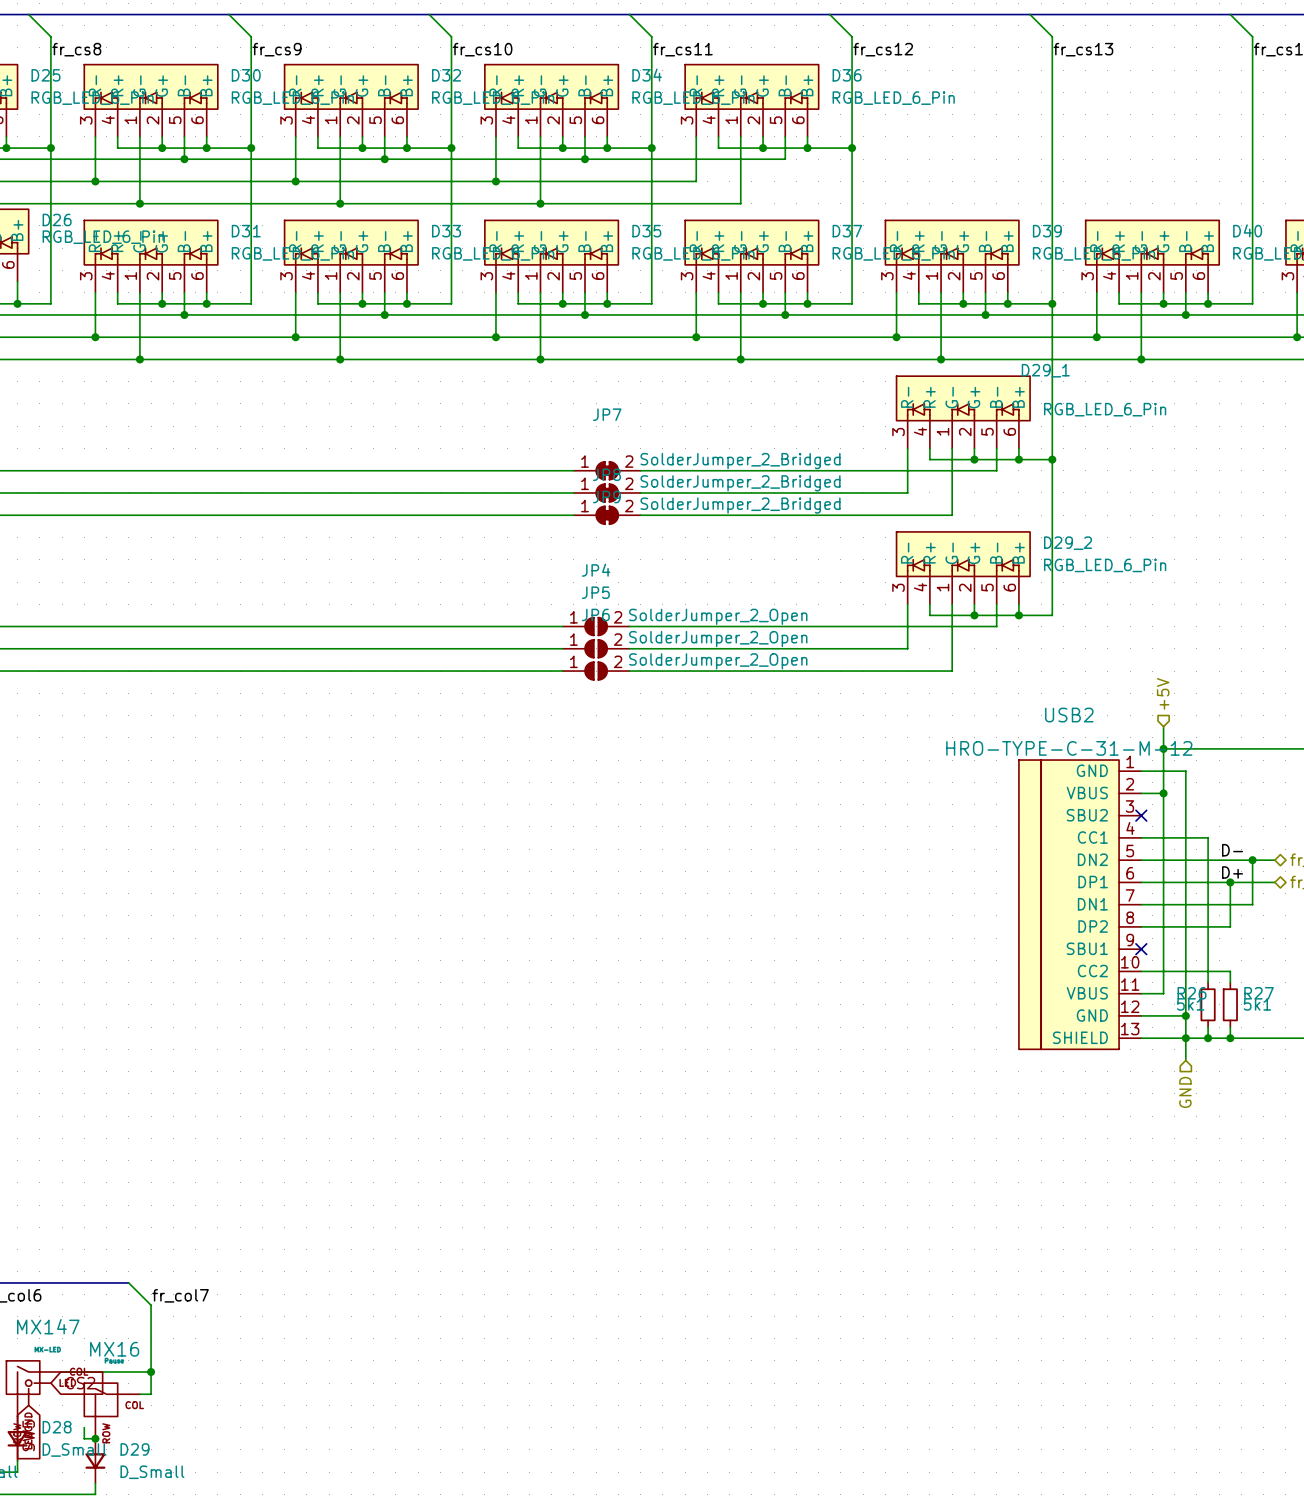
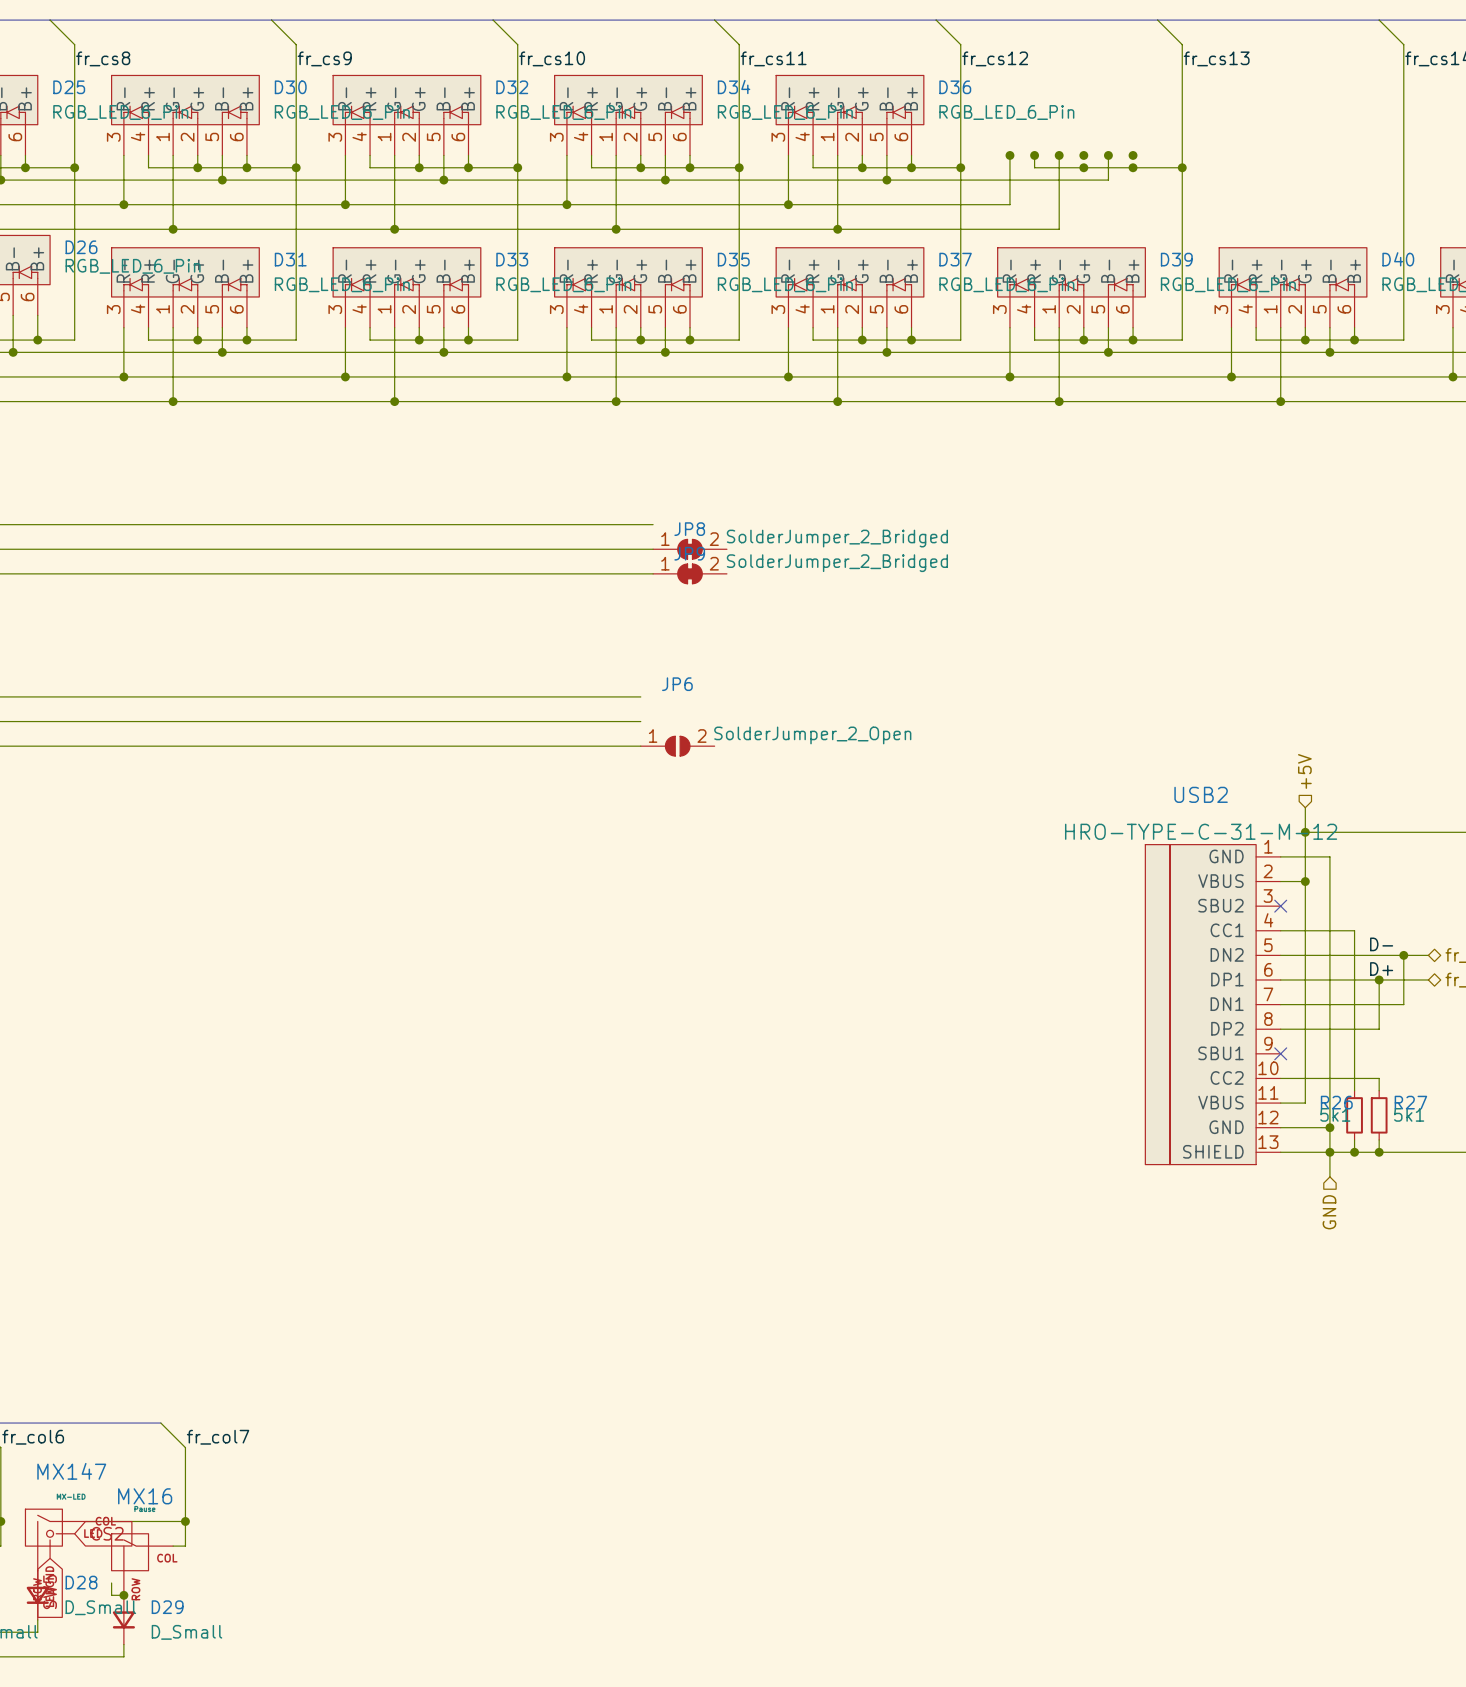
wire: none -> (1009, 155) (1009, 204) (788, 204)
junction: none -> (1009, 155)
wire: none -> (1034, 155) (1034, 167) (1182, 167)
junction: none -> (1034, 155)
wire: none -> (1059, 155) (1059, 229) (837, 229)
junction: none -> (1059, 155)
junction: none -> (1083, 155)
wire: none -> (1108, 155) (1108, 180) (886, 180)
junction: none -> (1108, 155)
junction: none -> (1133, 155)
junction: none -> (1083, 167)
junction: none -> (1133, 167)
junction: none -> (1182, 167)
junction: none -> (886, 180)
junction: none -> (788, 204)
junction: none -> (837, 229)
wire: (1052, 303) (1052, 615) (929, 615) (929, 604) -> none
junction: (1052, 303) -> none
D29_1: RGB_LED_6_Pin (963, 412) -> none
wire: (907, 448) (907, 492) (640, 492) -> none
wire: (929, 448) (929, 459) (1052, 459) -> none
wire: (952, 448) (952, 515) (640, 515) -> none
wire: (974, 448) (974, 459) -> none
wire: (996, 448) (996, 470) (640, 470) -> none
wire: (1018, 448) (1018, 459) -> none
junction: (974, 459) -> none
junction: (1018, 459) -> none
junction: (1052, 459) -> none
JP7: SolderJumper_2_Bridged (607, 470) -> none
D29_2: RGB_LED_6_Pin (963, 568) -> none
wire: (907, 604) (907, 648) (629, 648) -> none
wire: (952, 604) (952, 671) (629, 671) -> none
wire: (974, 604) (974, 615) -> none
wire: (996, 604) (996, 626) (629, 626) -> none
wire: (1018, 604) (1018, 615) -> none
junction: (974, 615) -> none
junction: (1018, 615) -> none
JP4: SolderJumper_2_Open (596, 626) -> none
JP5: SolderJumper_2_Open (596, 648) -> none

